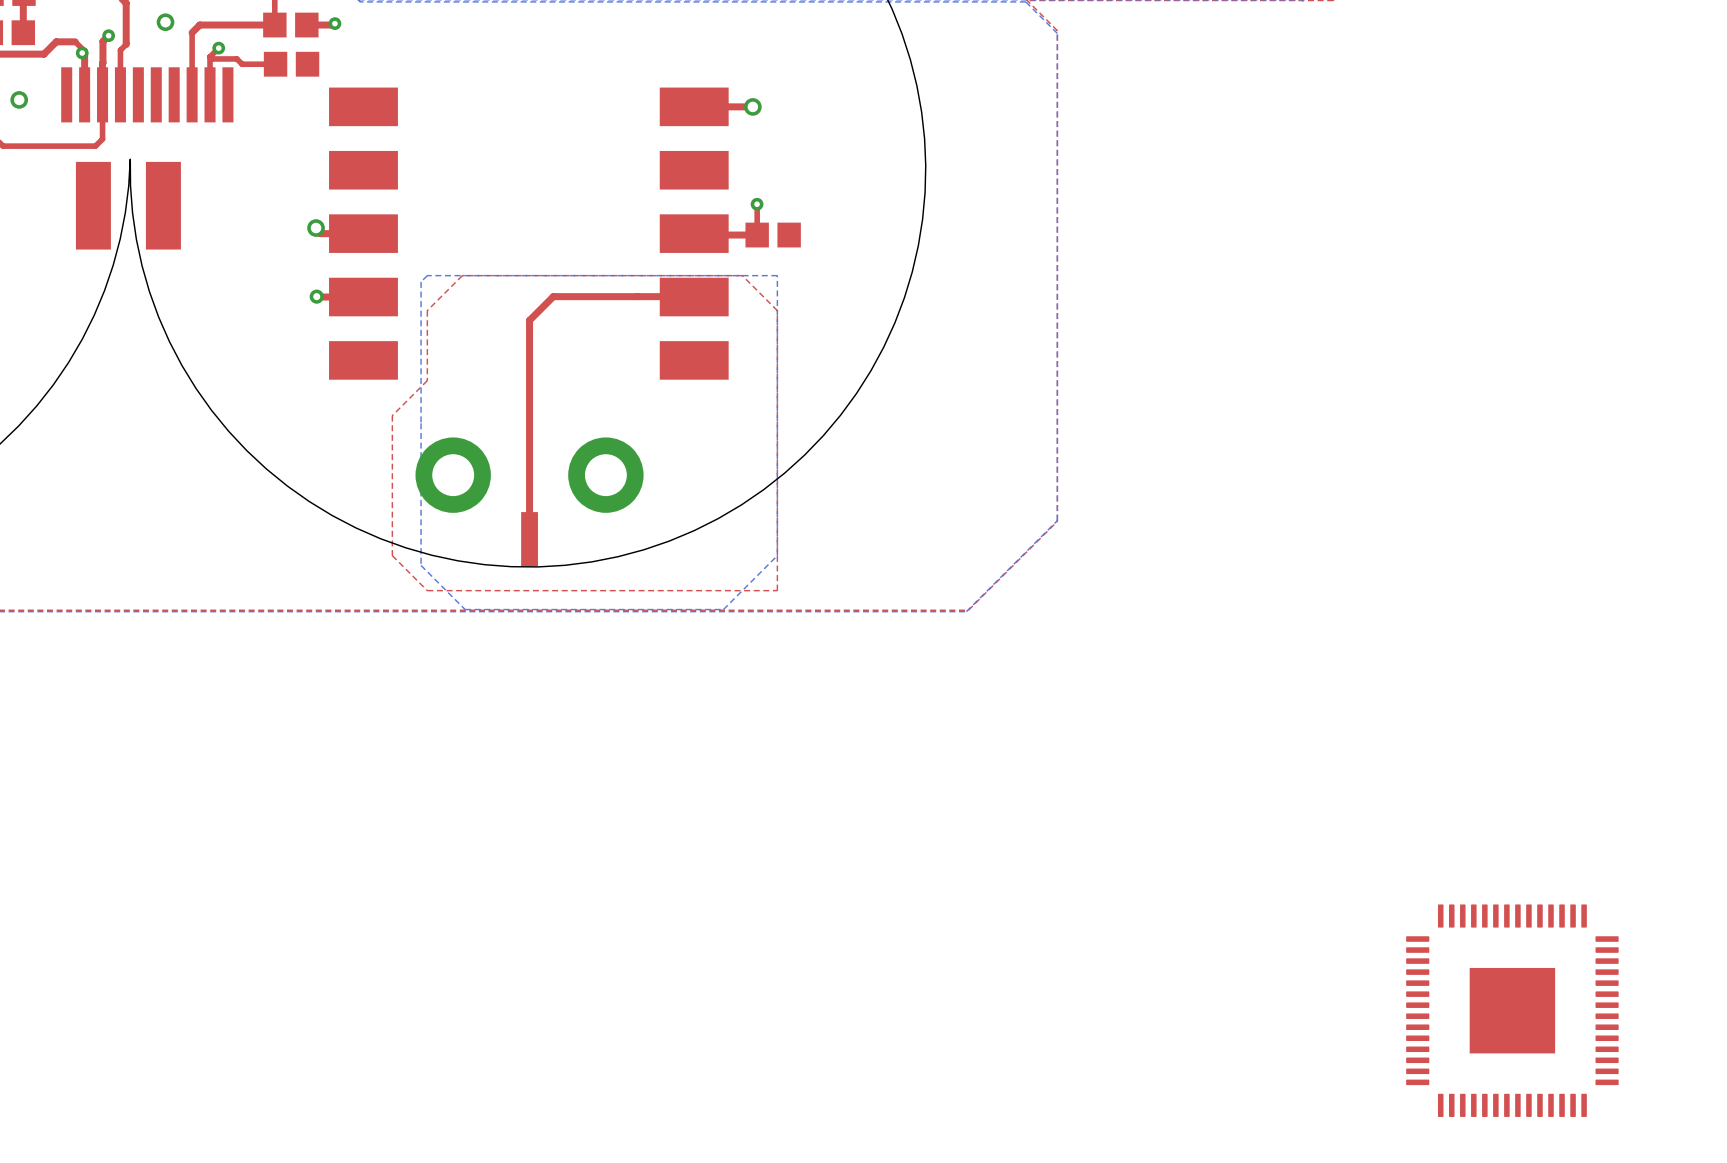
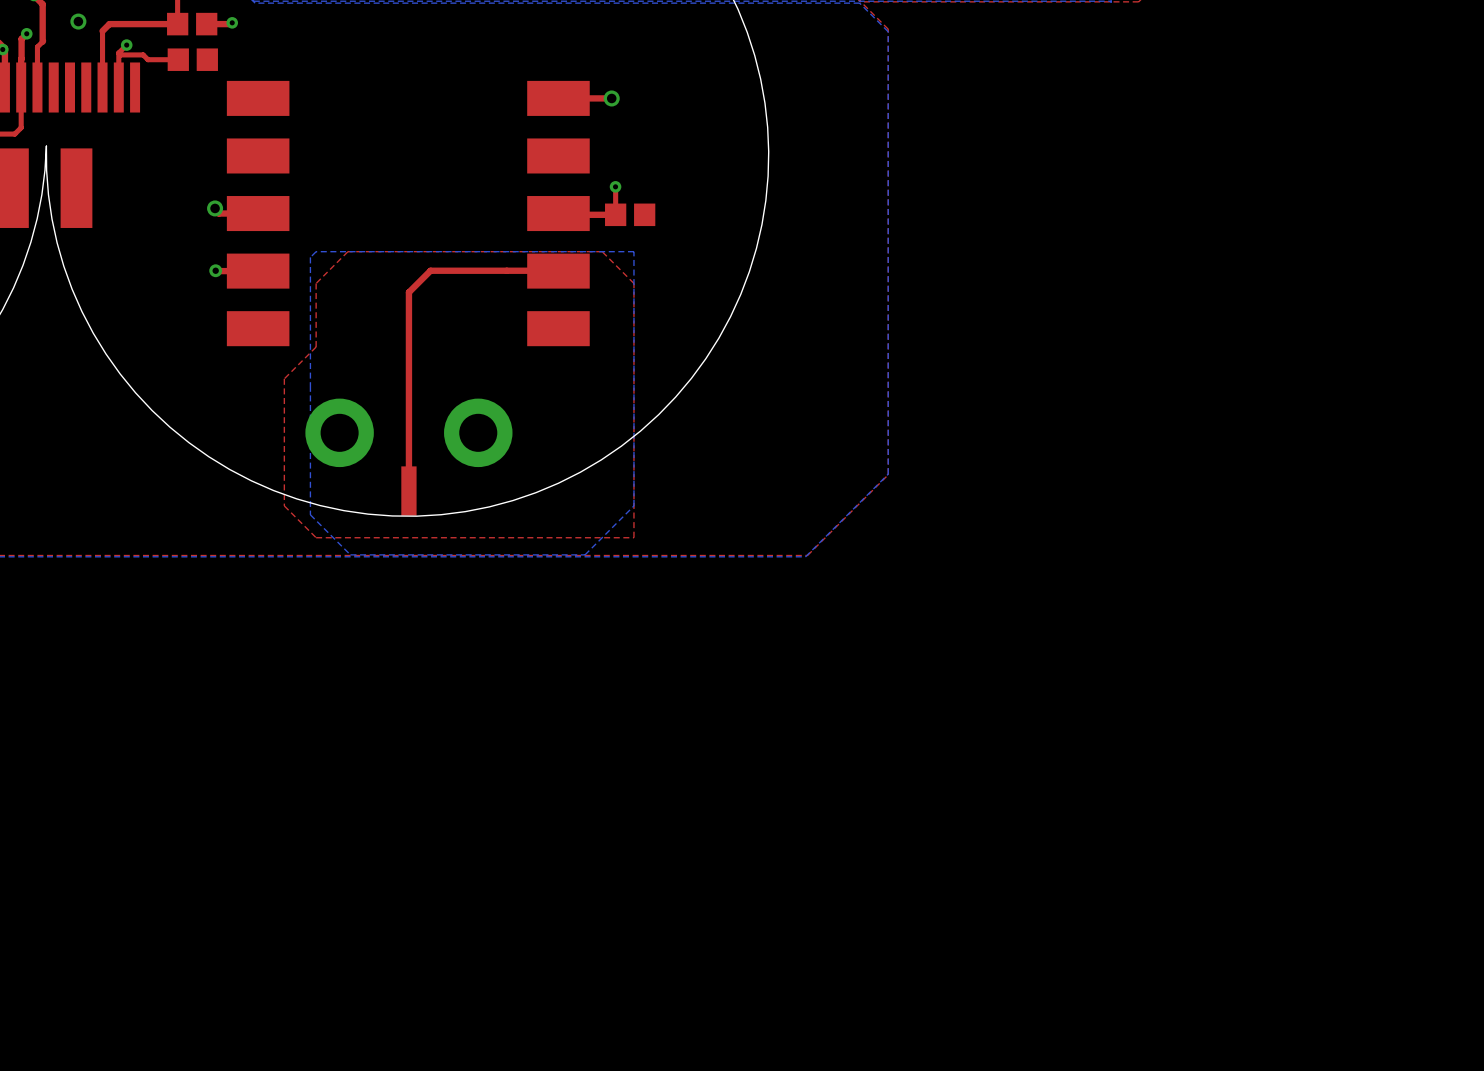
part: (1512, 1010) -> none

